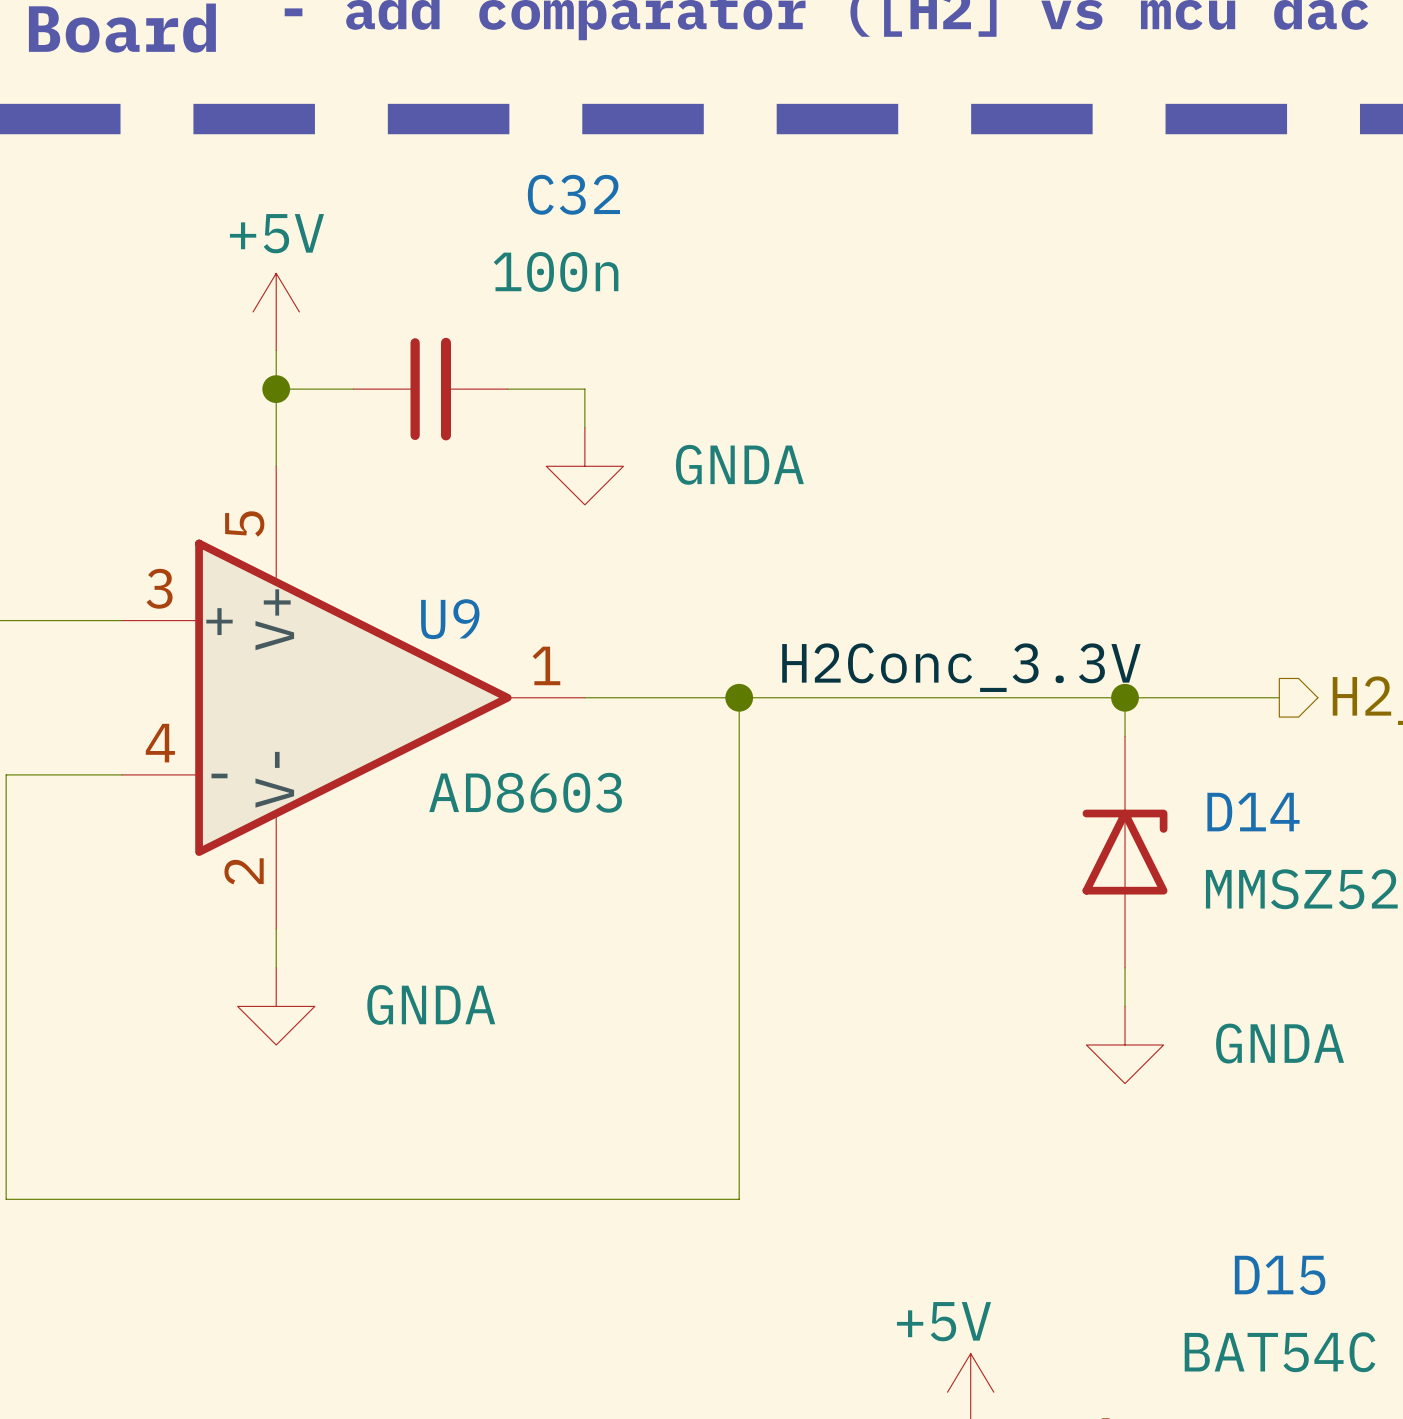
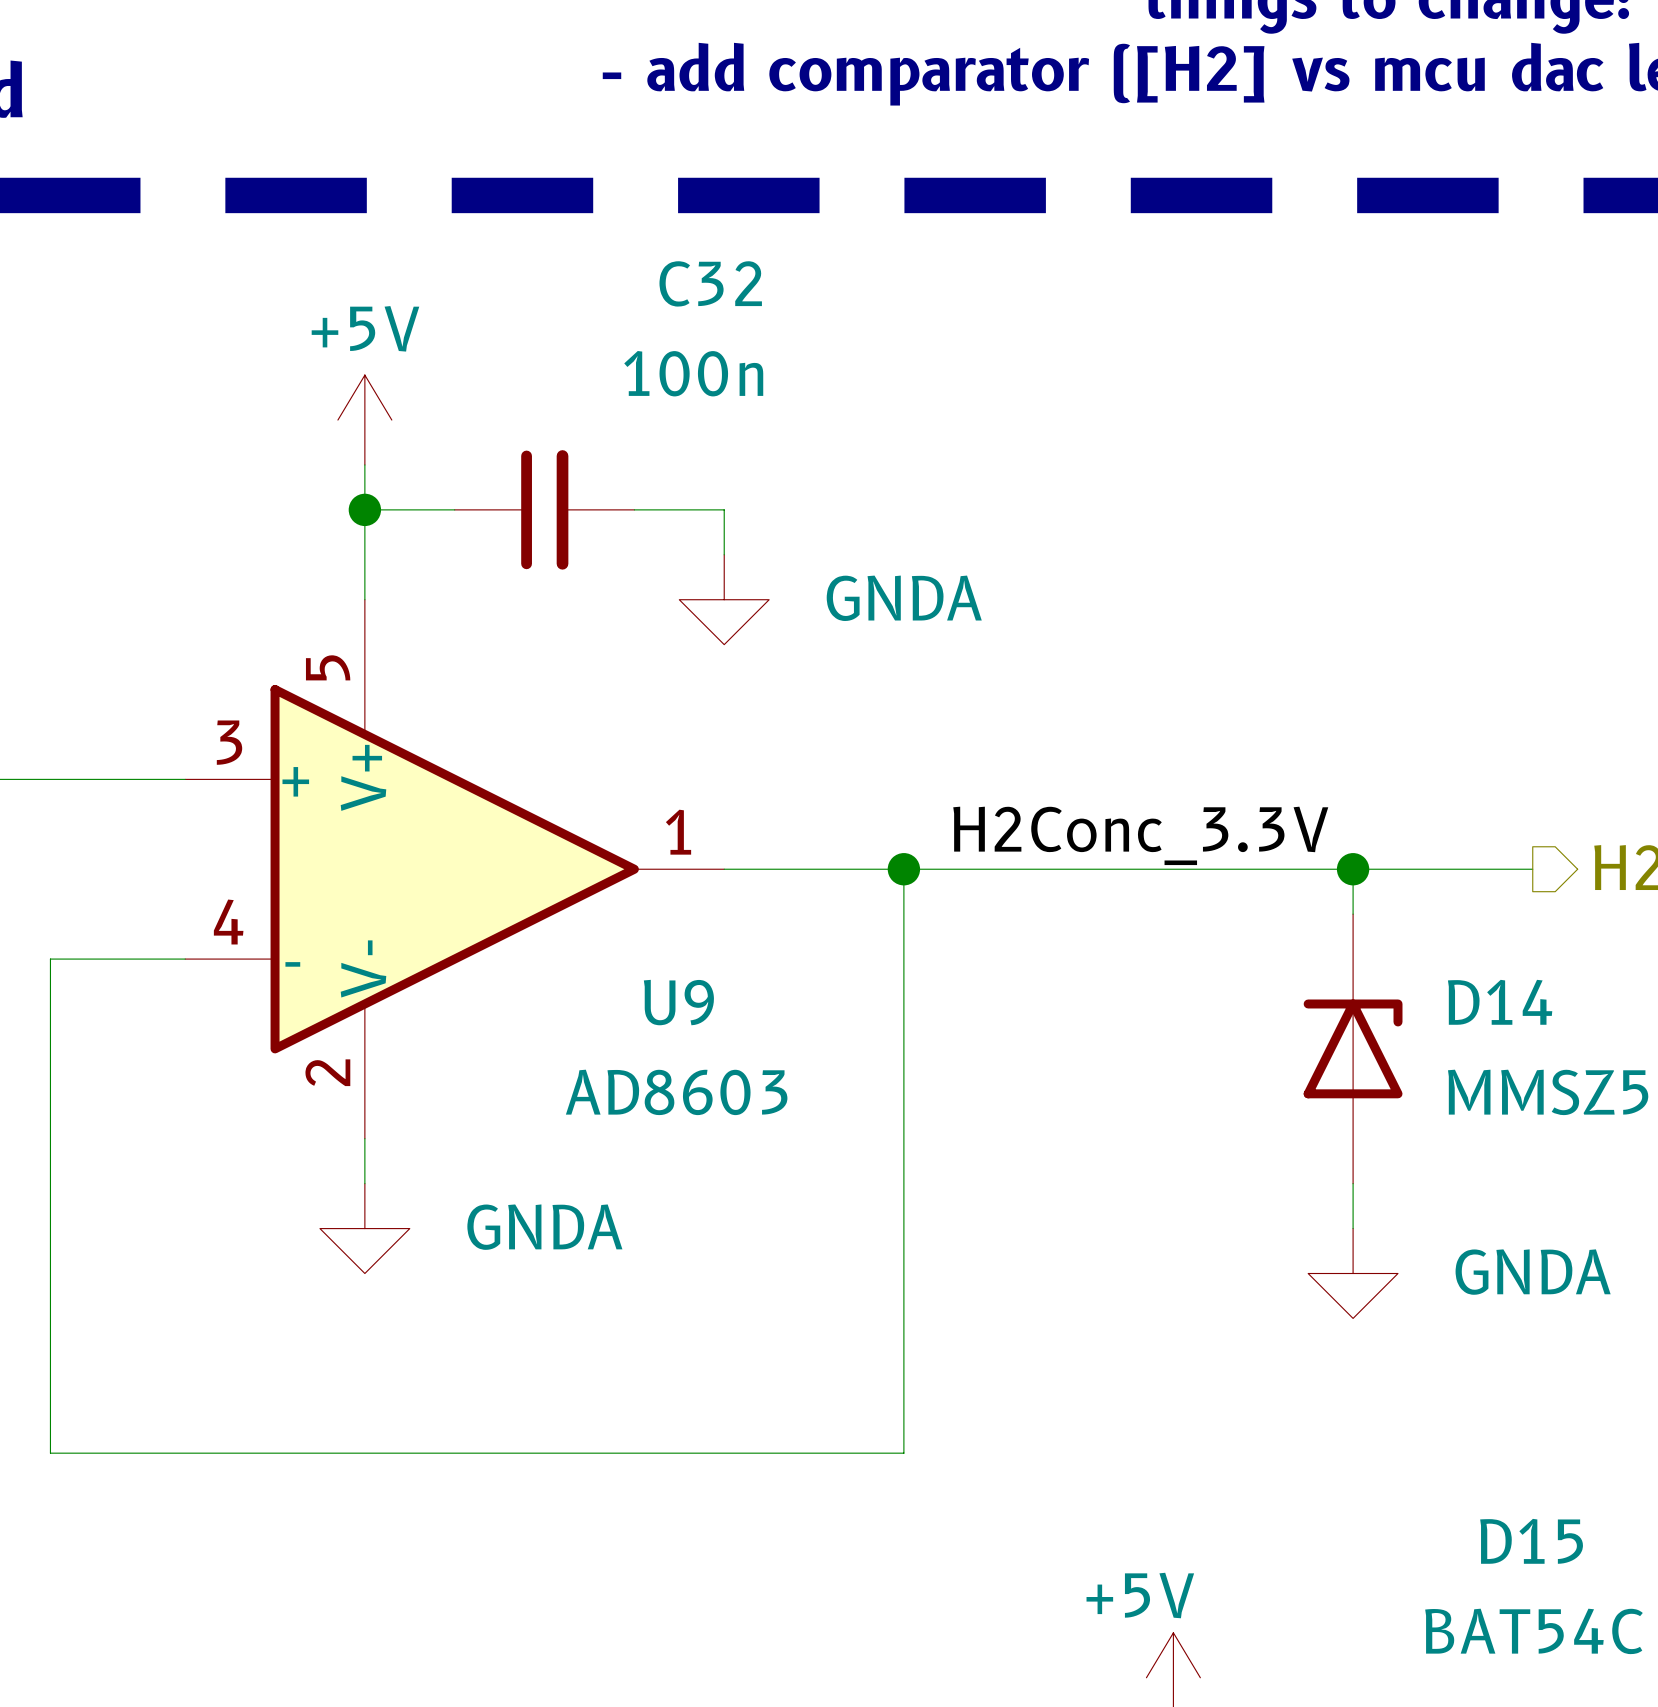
U9 name position: U9 (450, 619) -> U9 (678, 1002)
U9 value position: AD8603 (525, 792) -> AD8603 (676, 1092)

